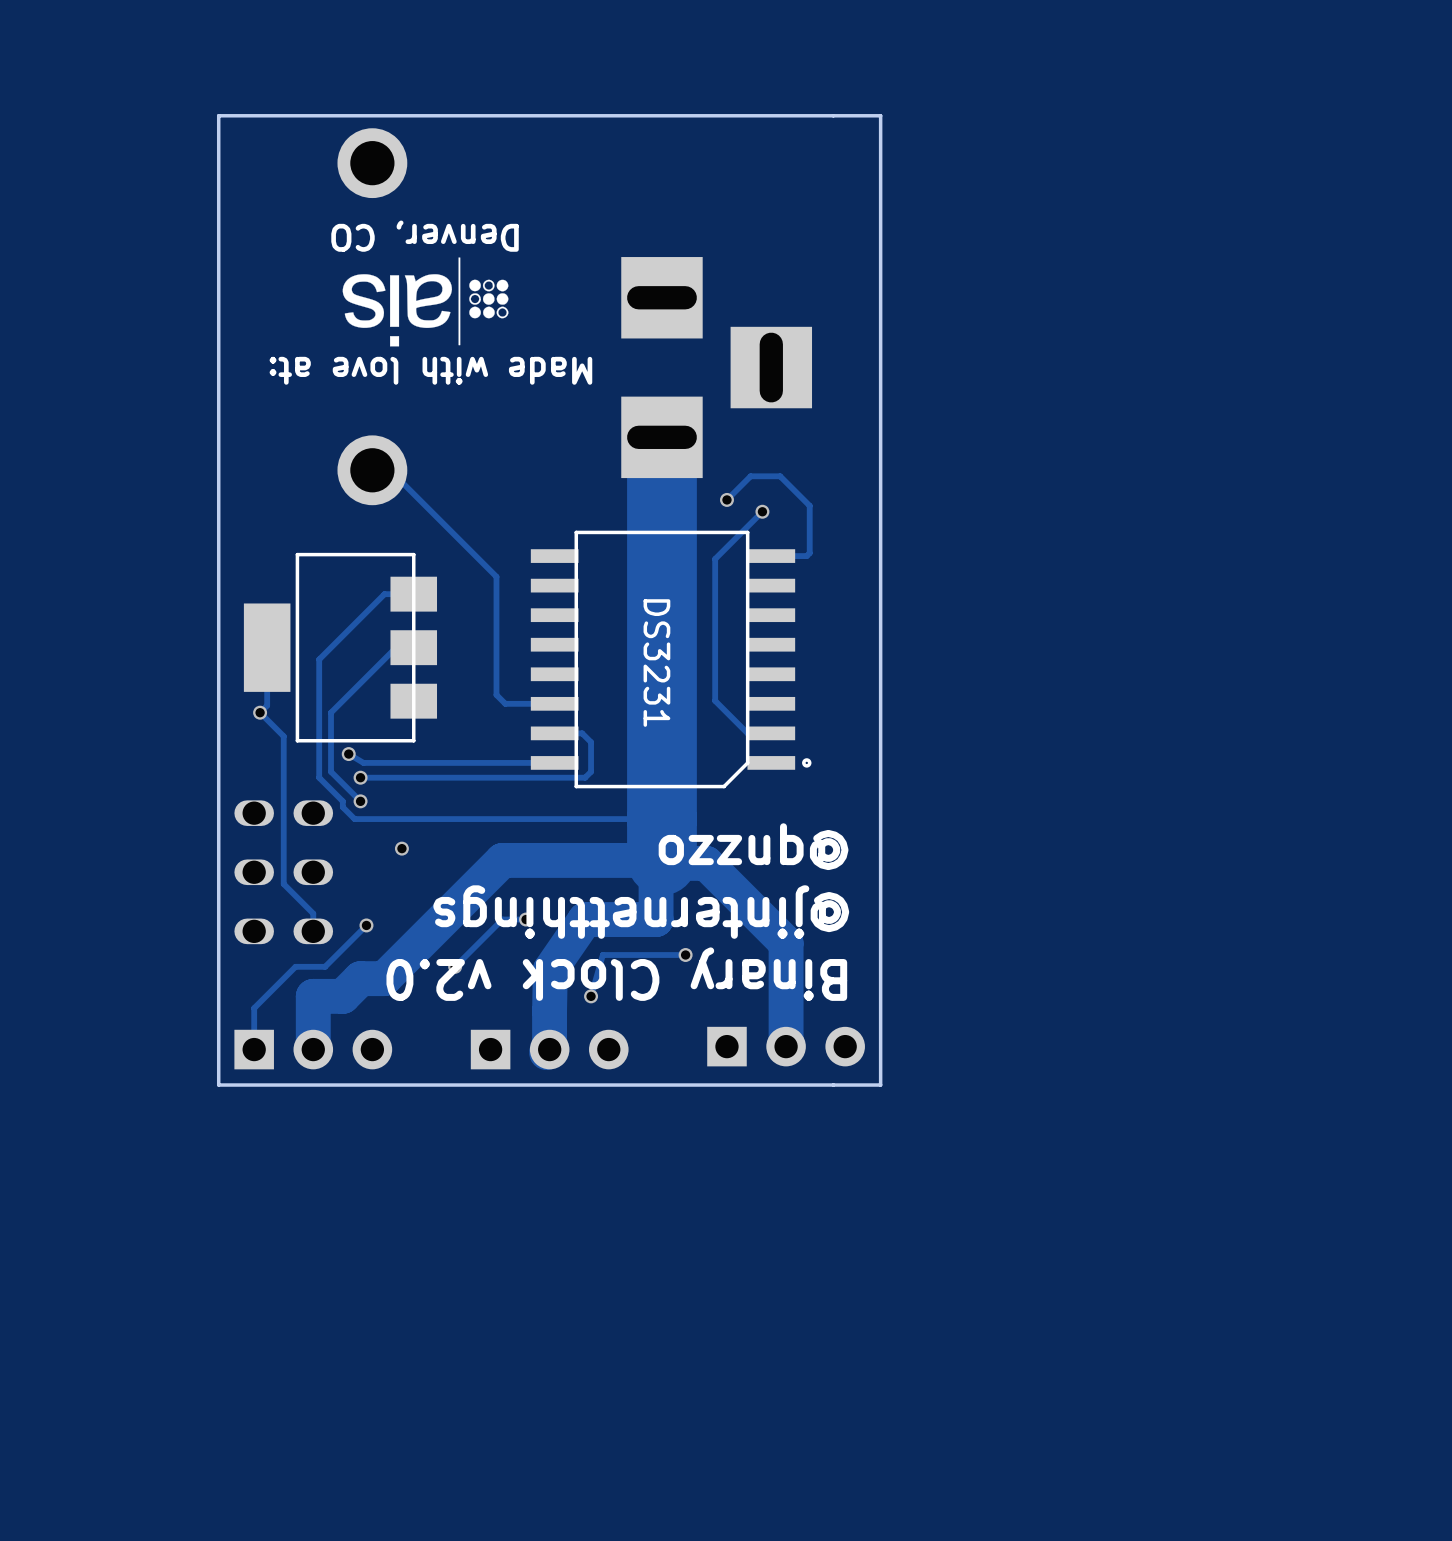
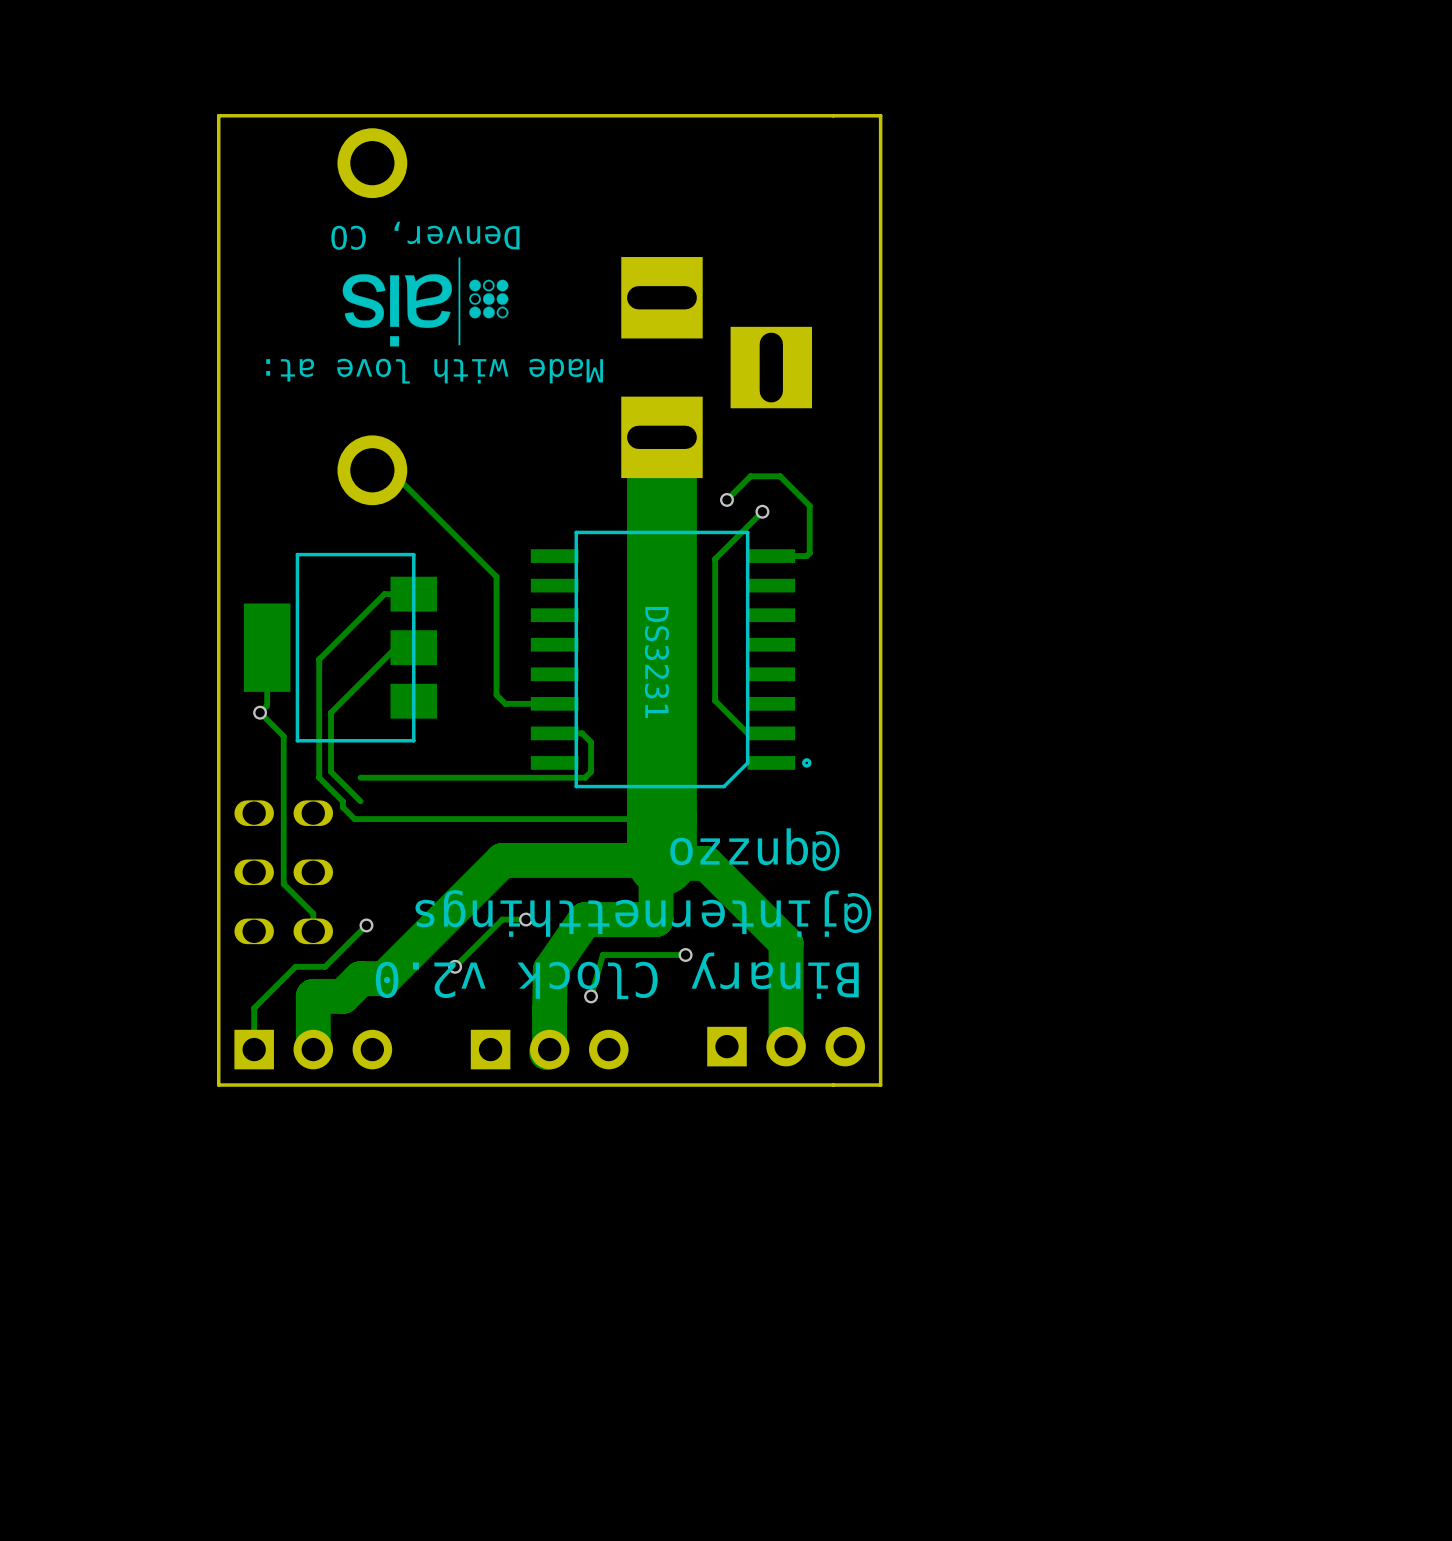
track: (348, 754) (363, 762) (554, 762) -> none
via: (348, 754) -> none
via: (360, 777) -> none
via: (360, 801) -> none
via: (401, 848) -> none

